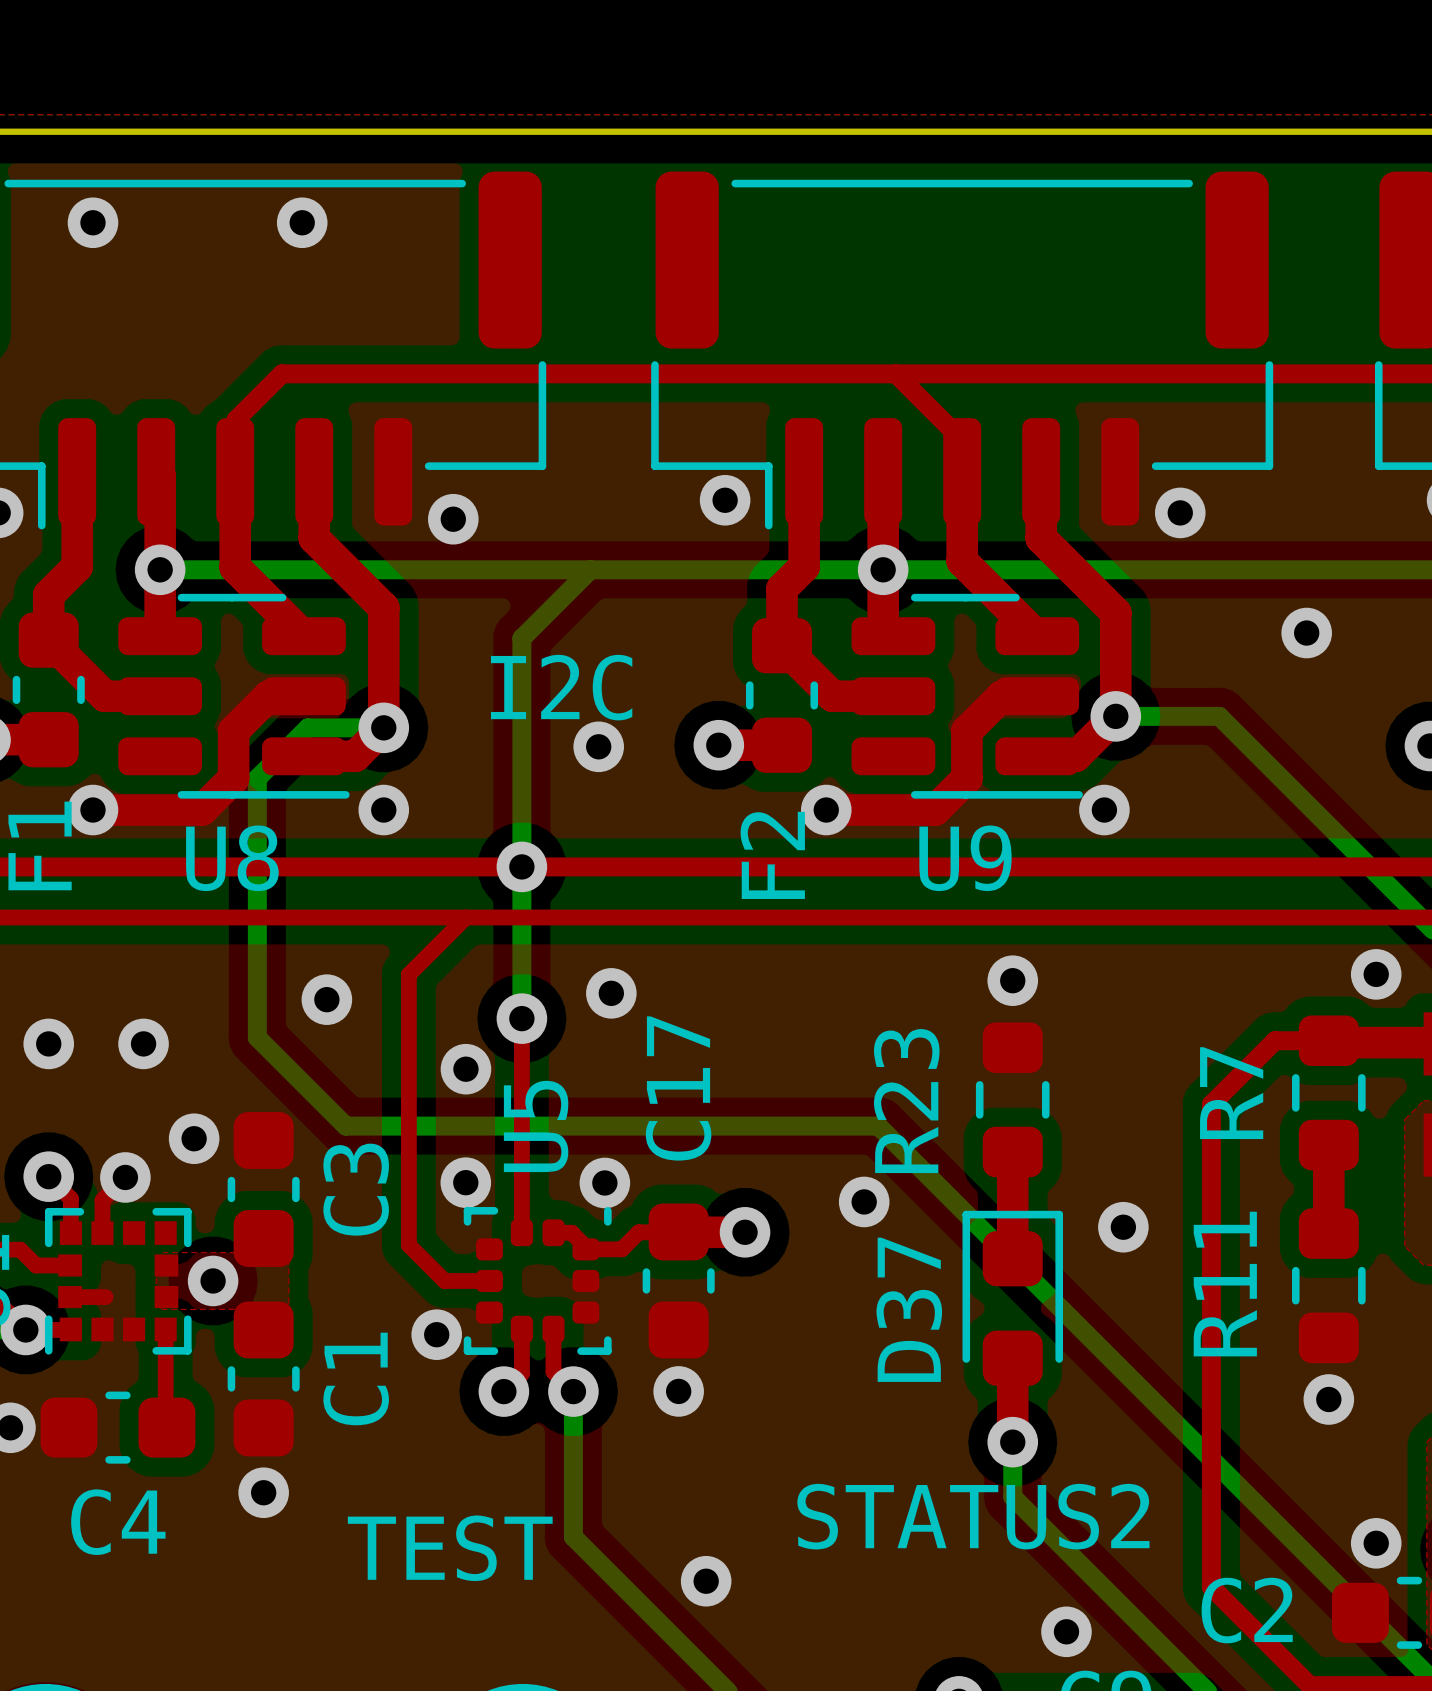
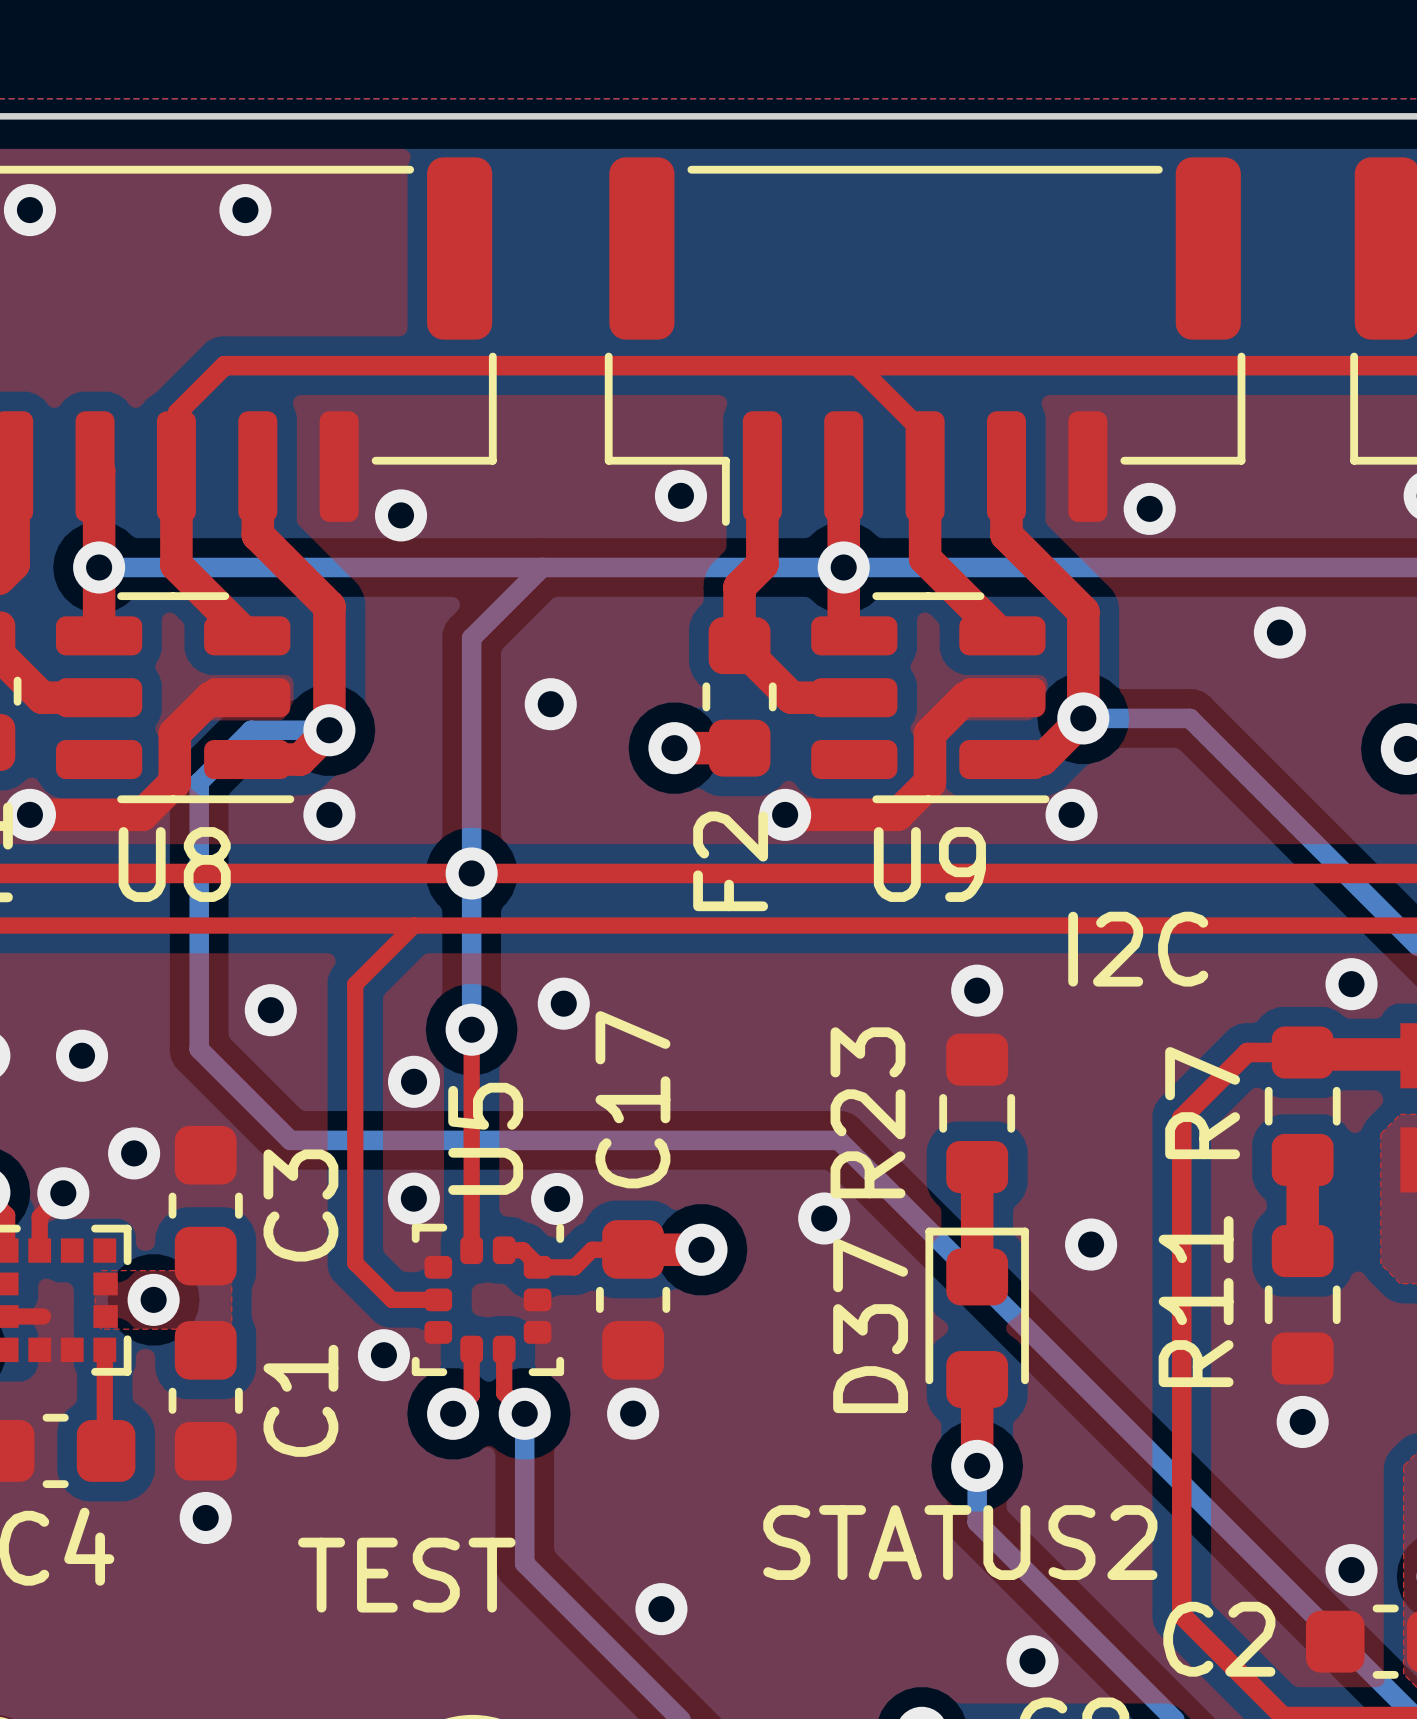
text position: I2C (561, 687) -> I2C (1138, 949)
via position: (598, 746) -> (550, 704)

